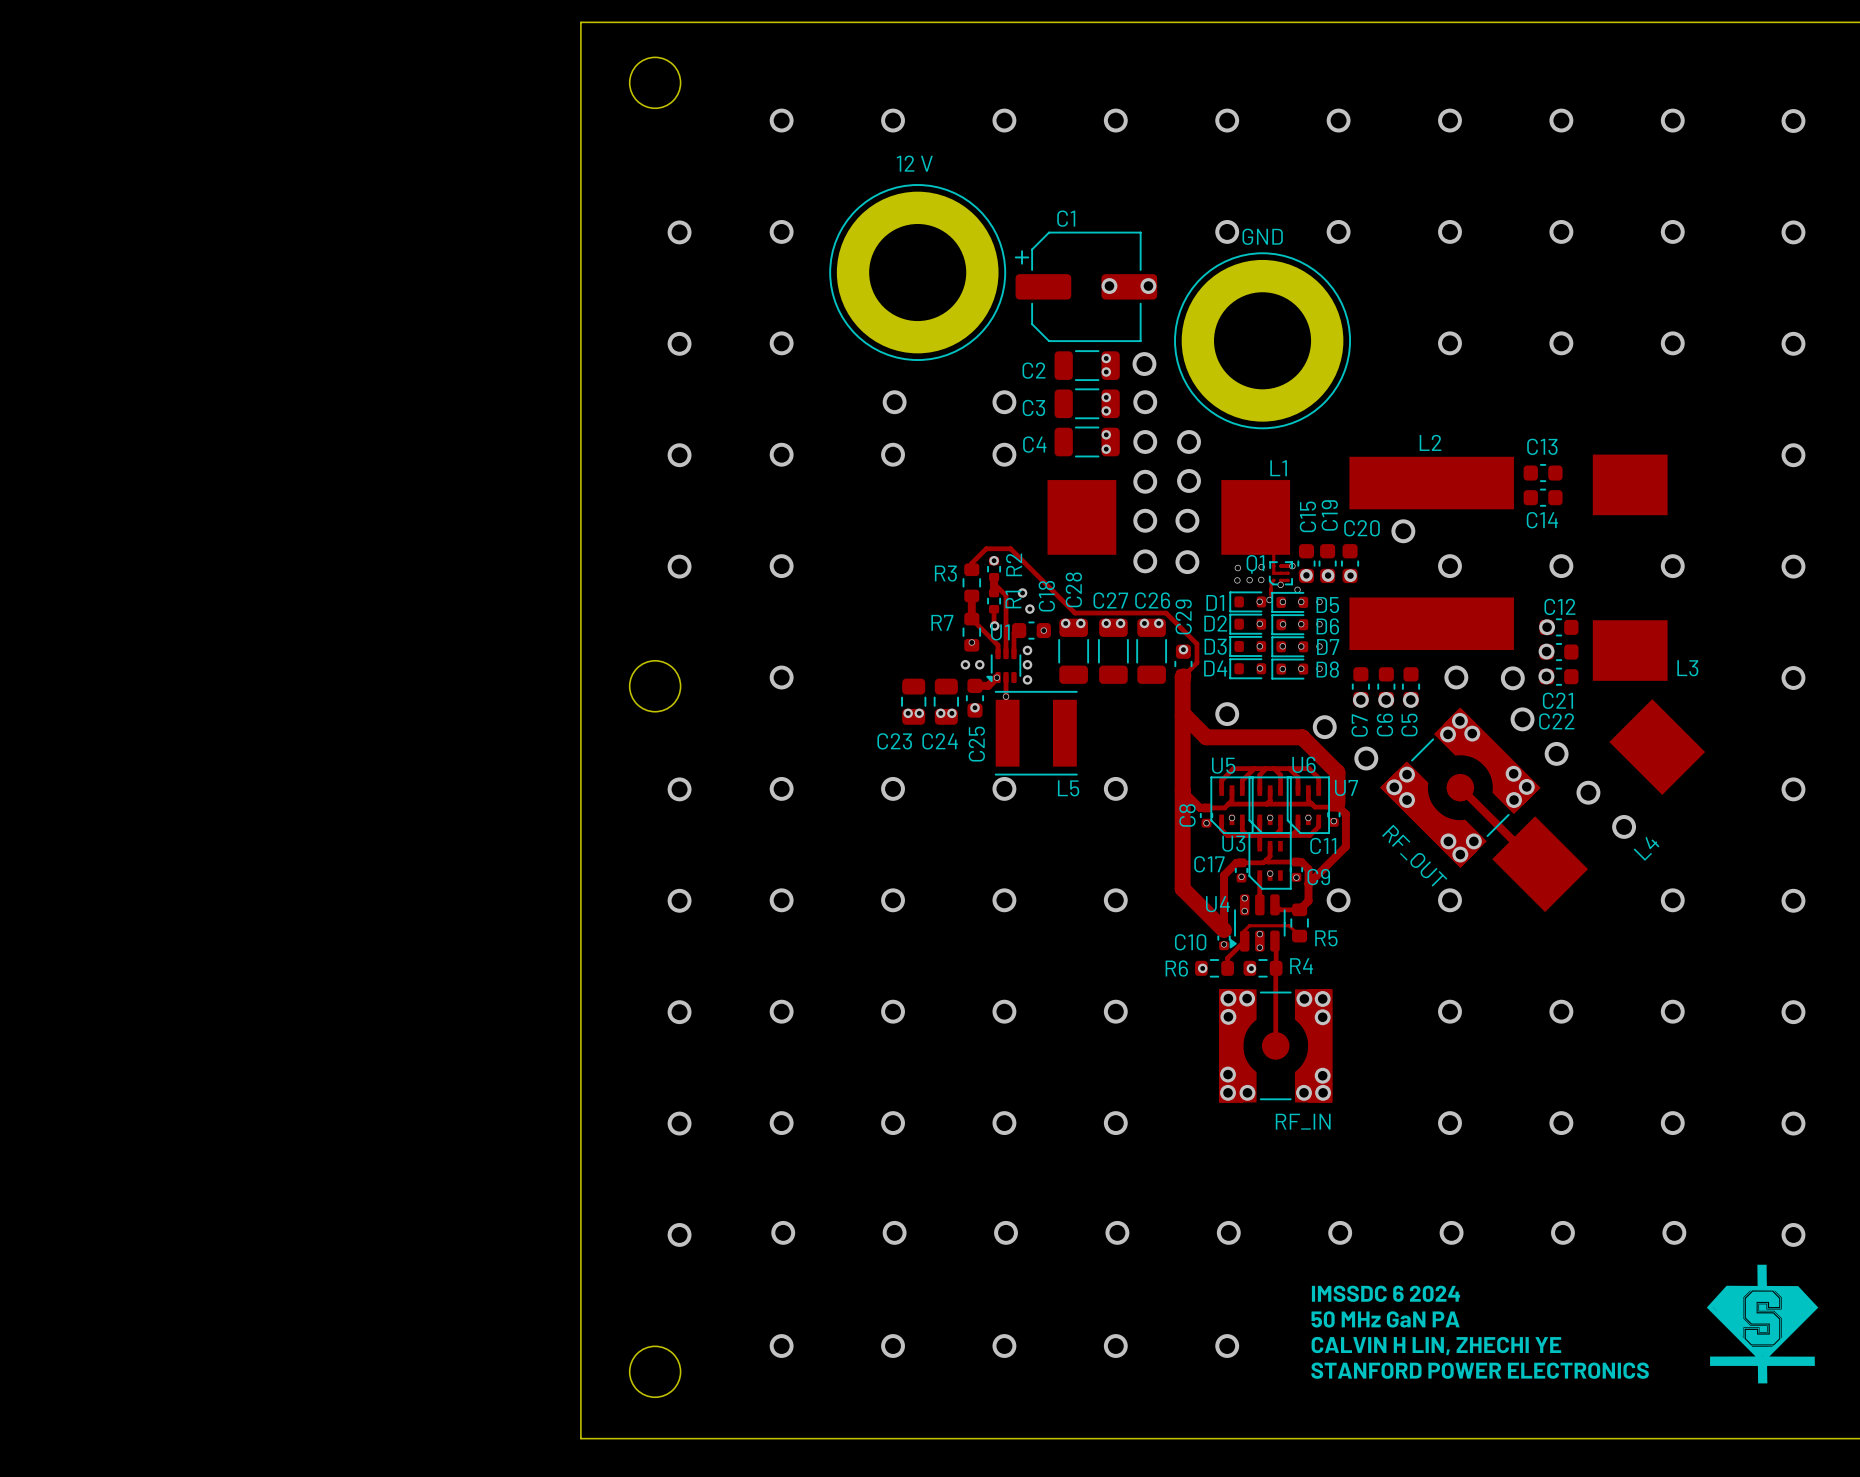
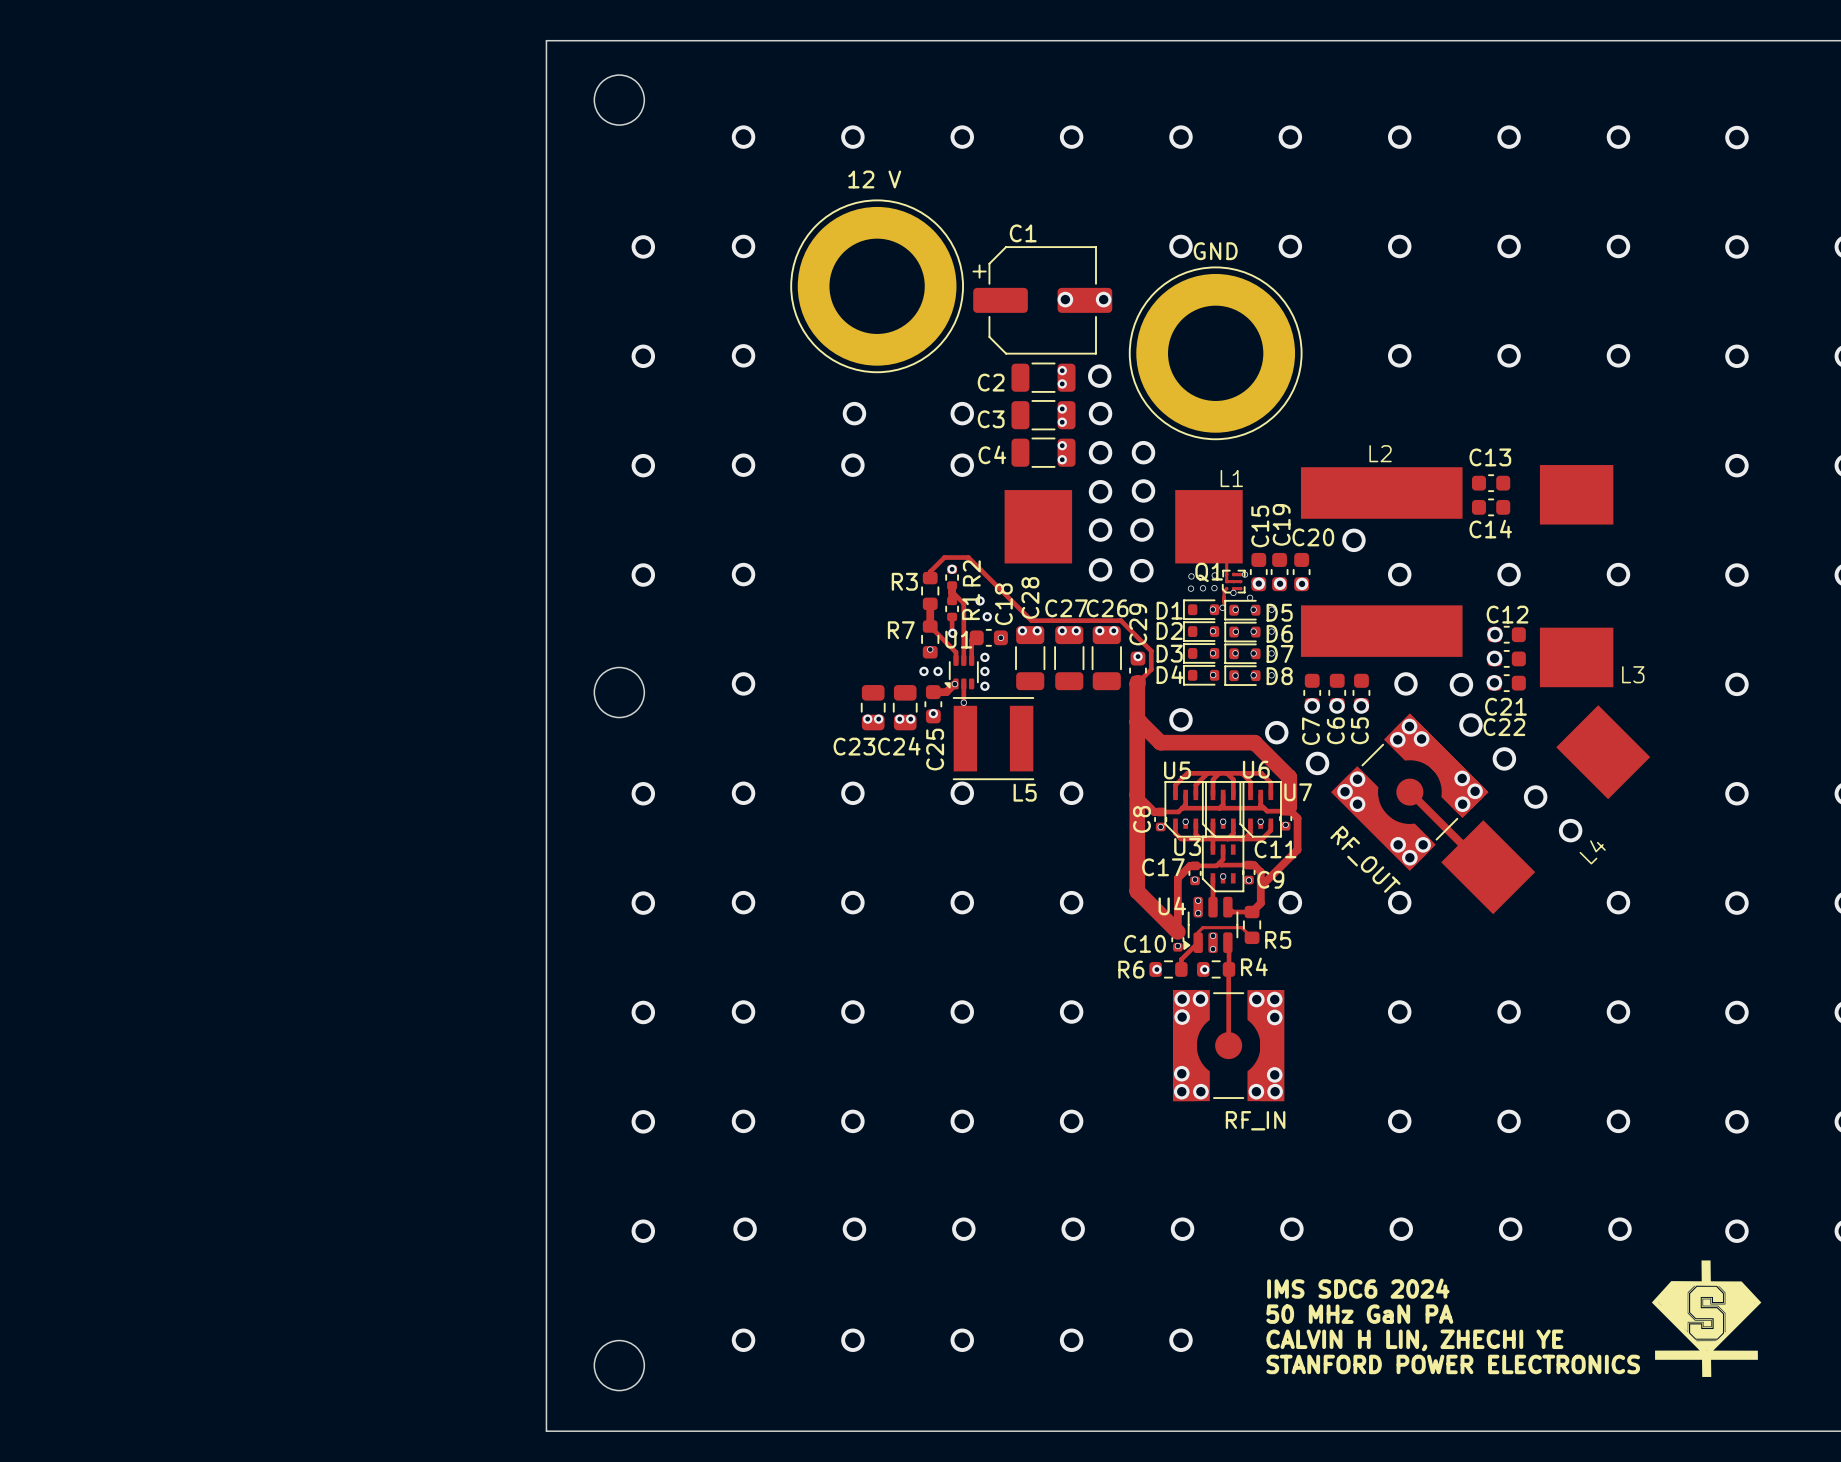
text: IMSSDC 6 2024 (1385, 1293) -> IMS SDC6 2024 (1358, 1288)

